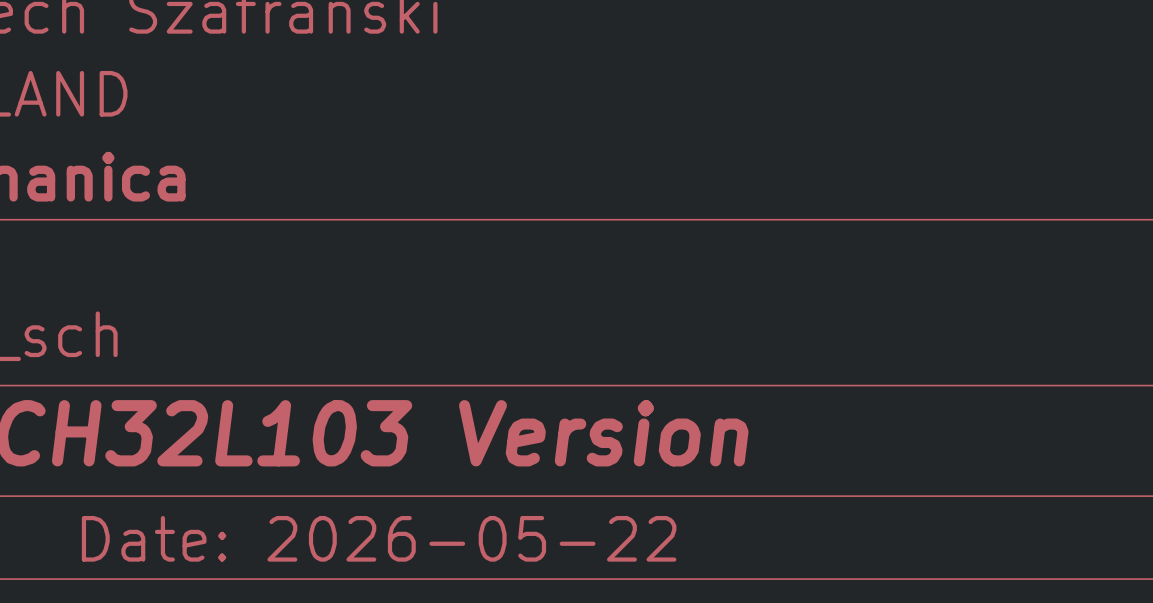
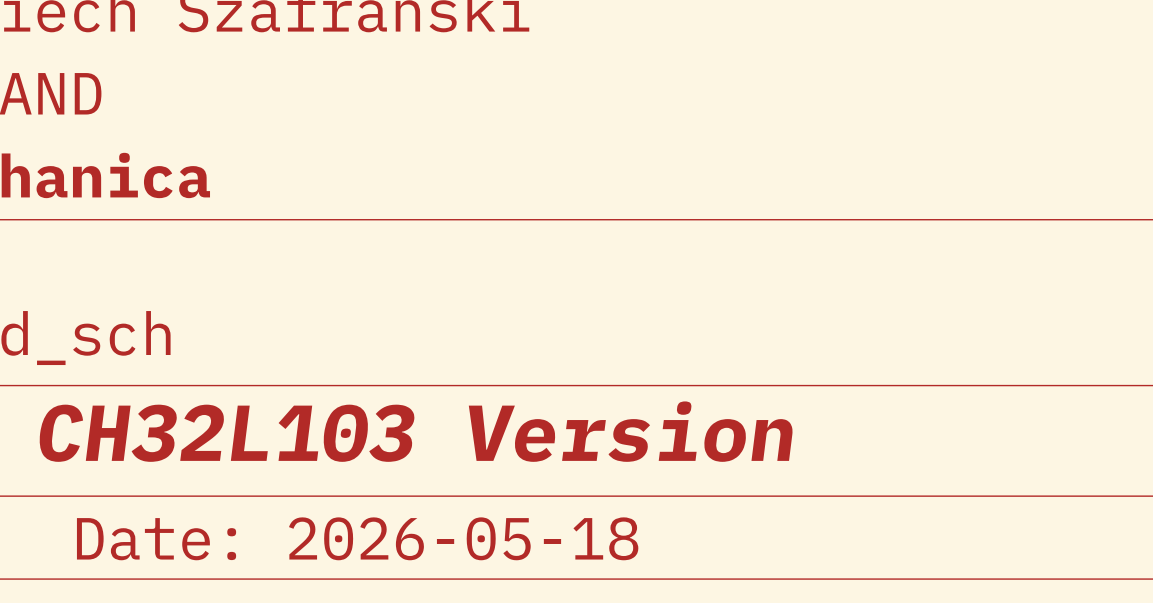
title block: Date: 2026-05-22 (379, 538) -> Date: 2026-05-18 (357, 538)

